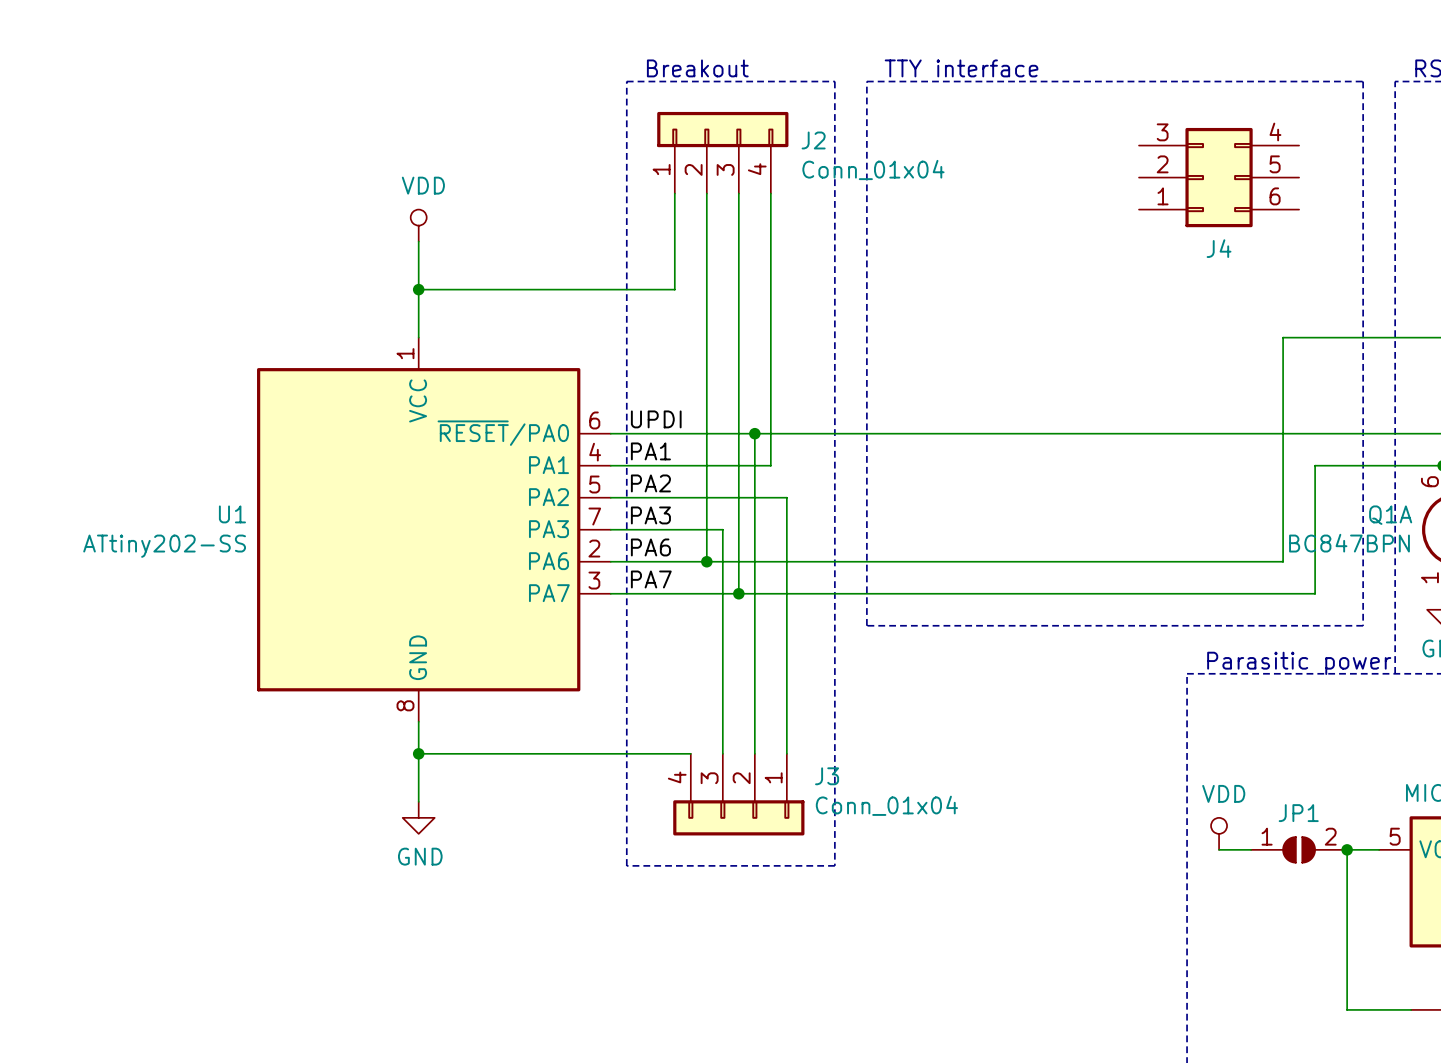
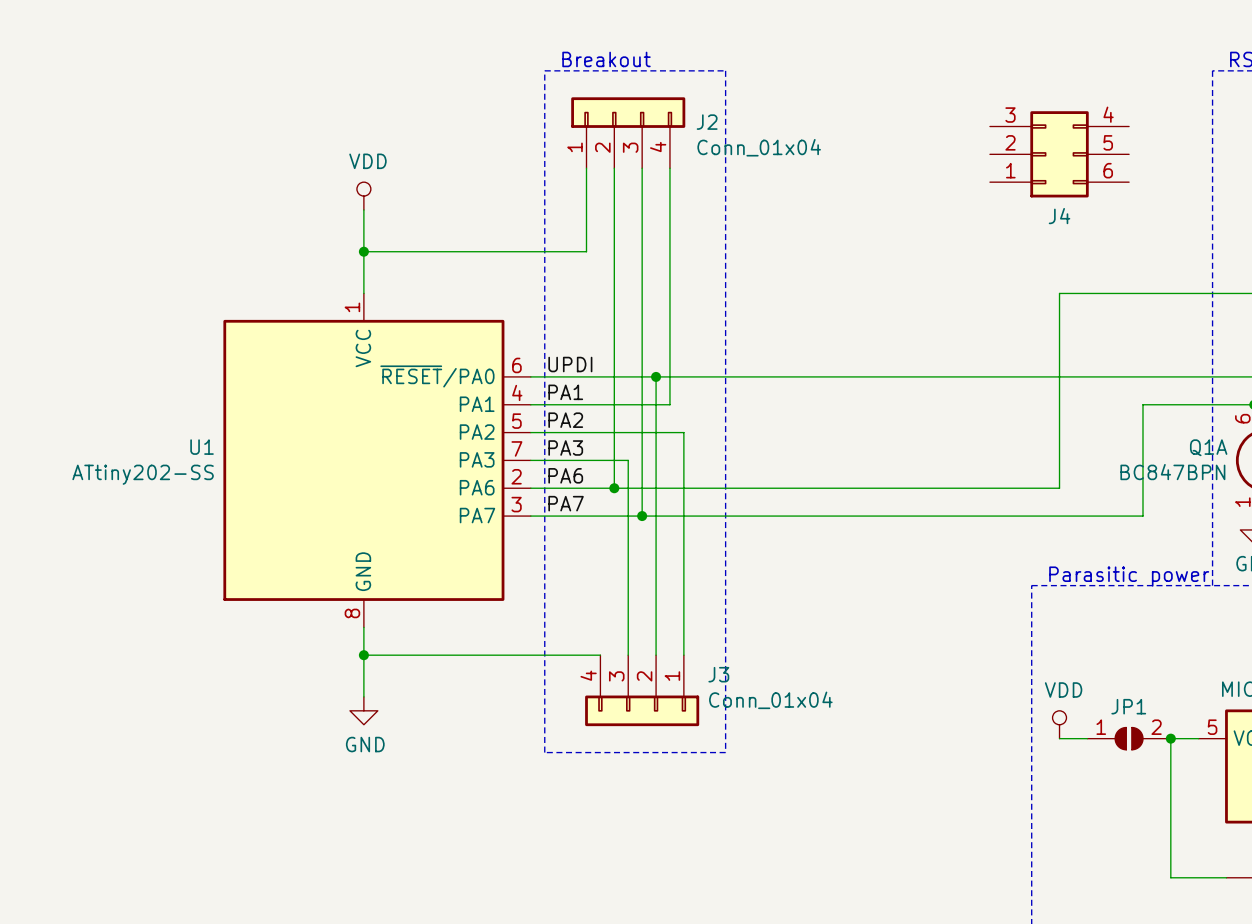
text: TTY interface (961, 68) -> none
line: (866, 81) (1363, 81) (1363, 625) (866, 625) (866, 81) -> none
wire: (1283, 337) (1283, 561) (1219, 561) -> (1115, 293) (1059, 293) (1059, 488)

